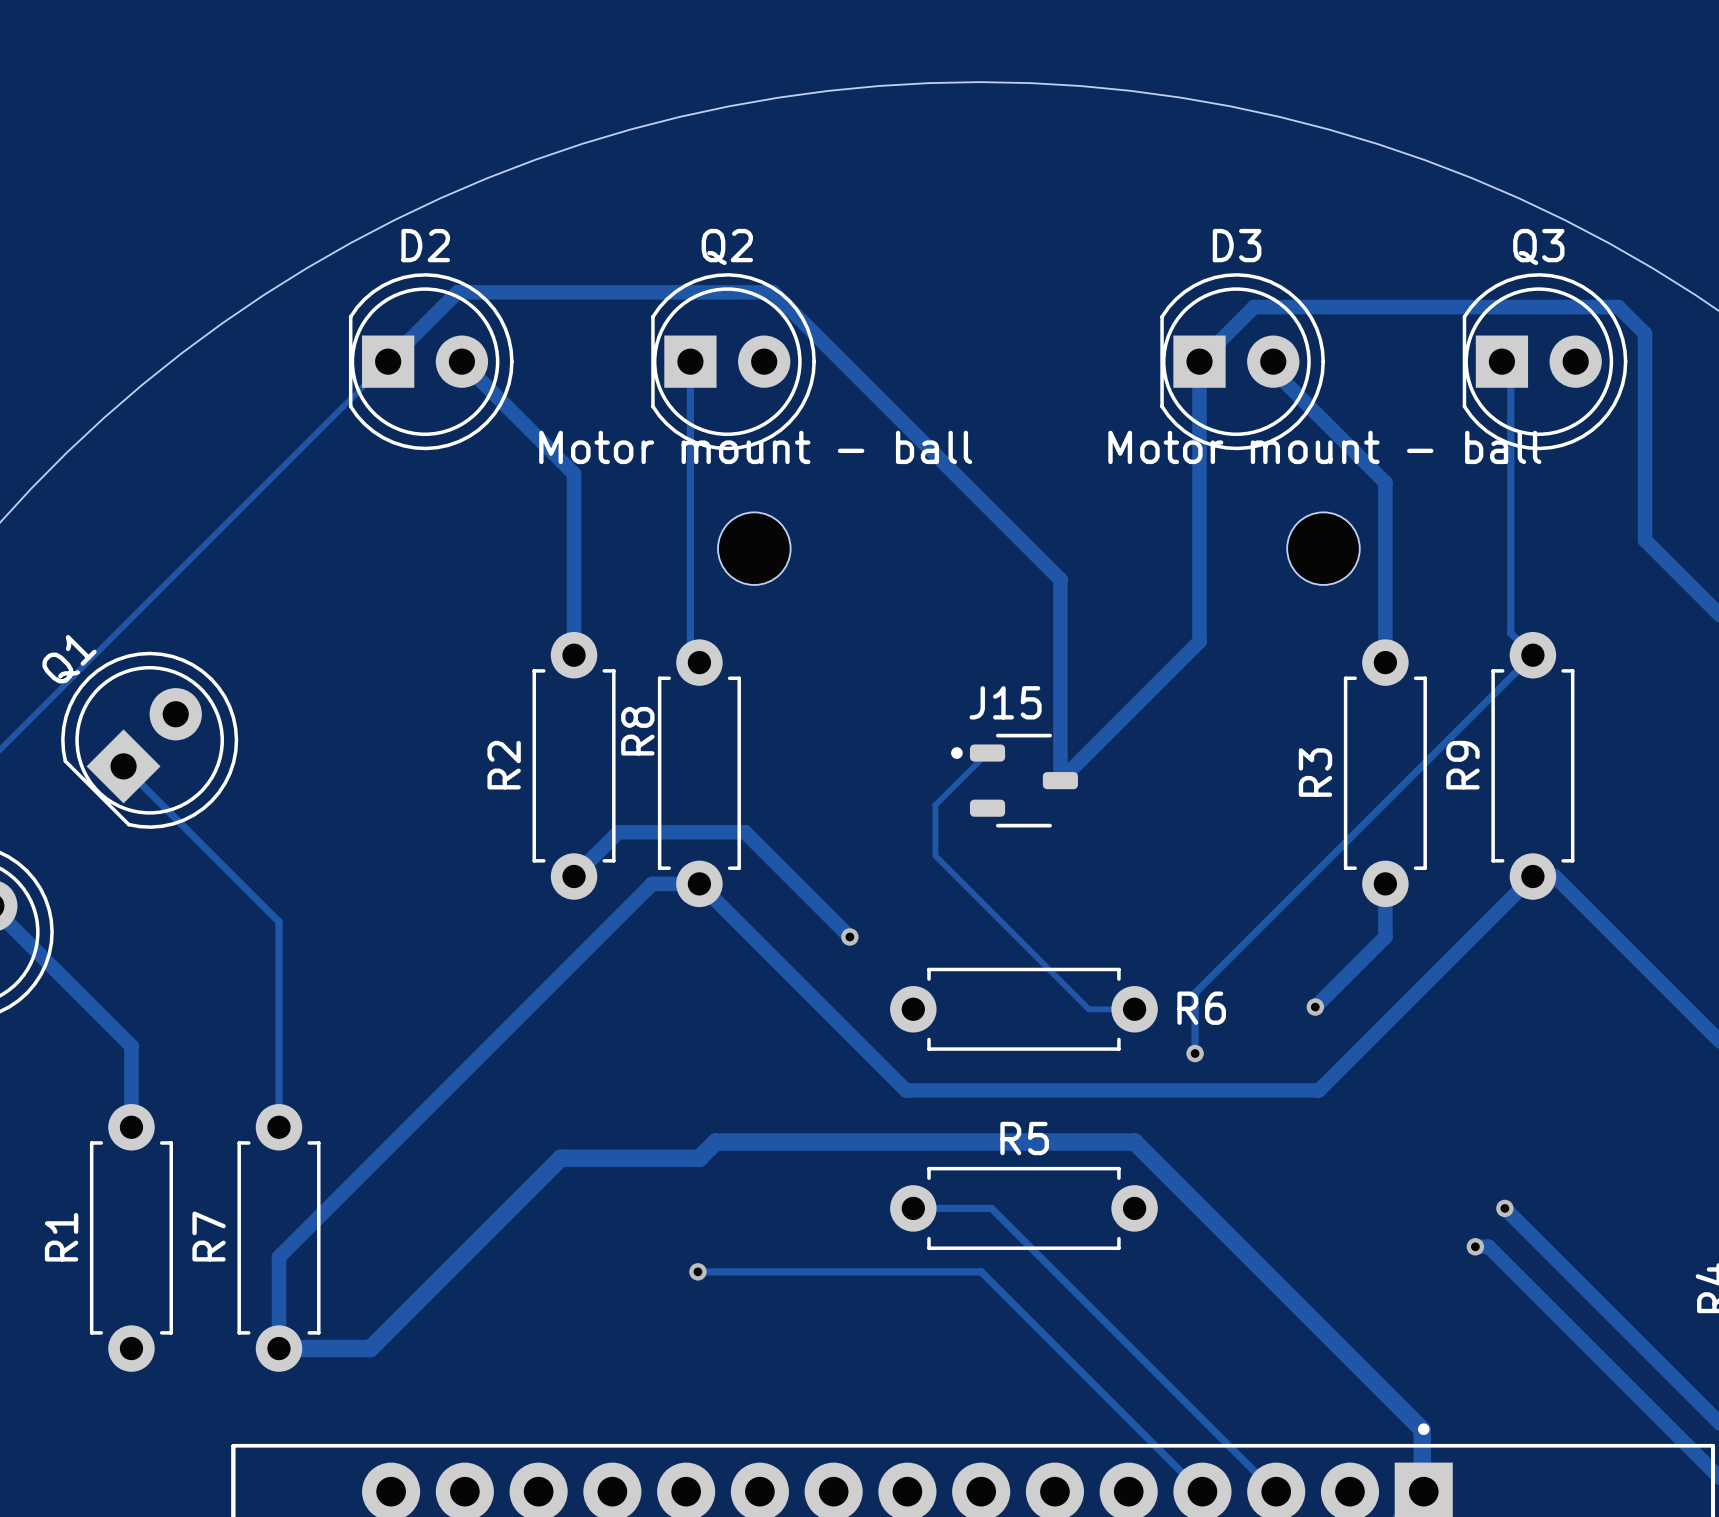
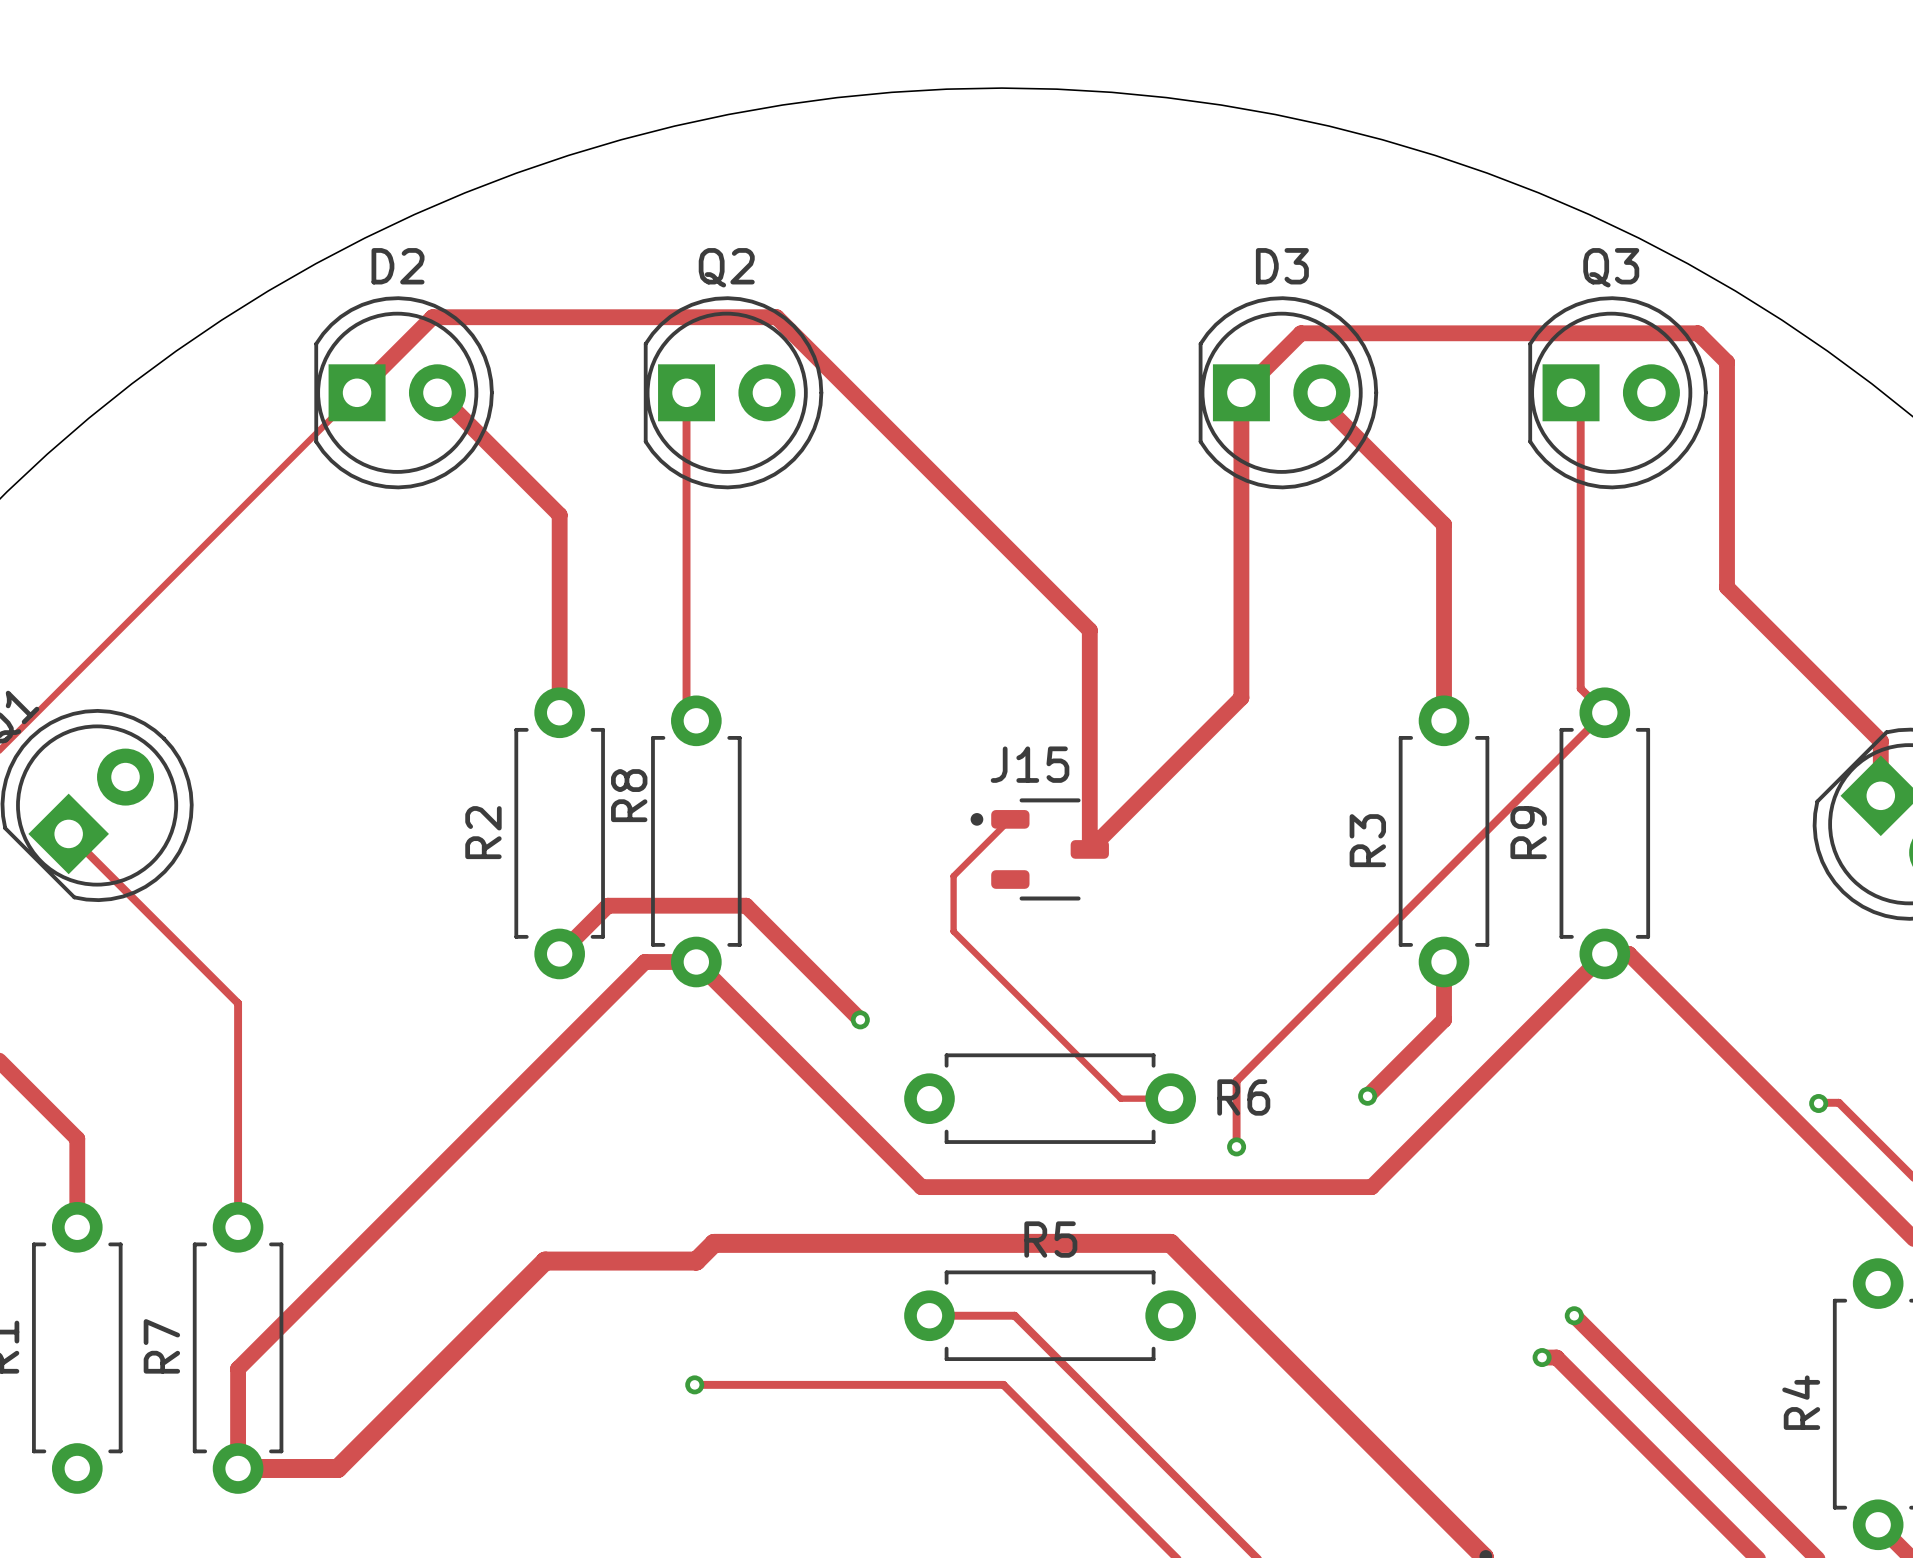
Motor mount - ball: (754, 548) -> none
Motor mount - ball: (1323, 548) -> none

